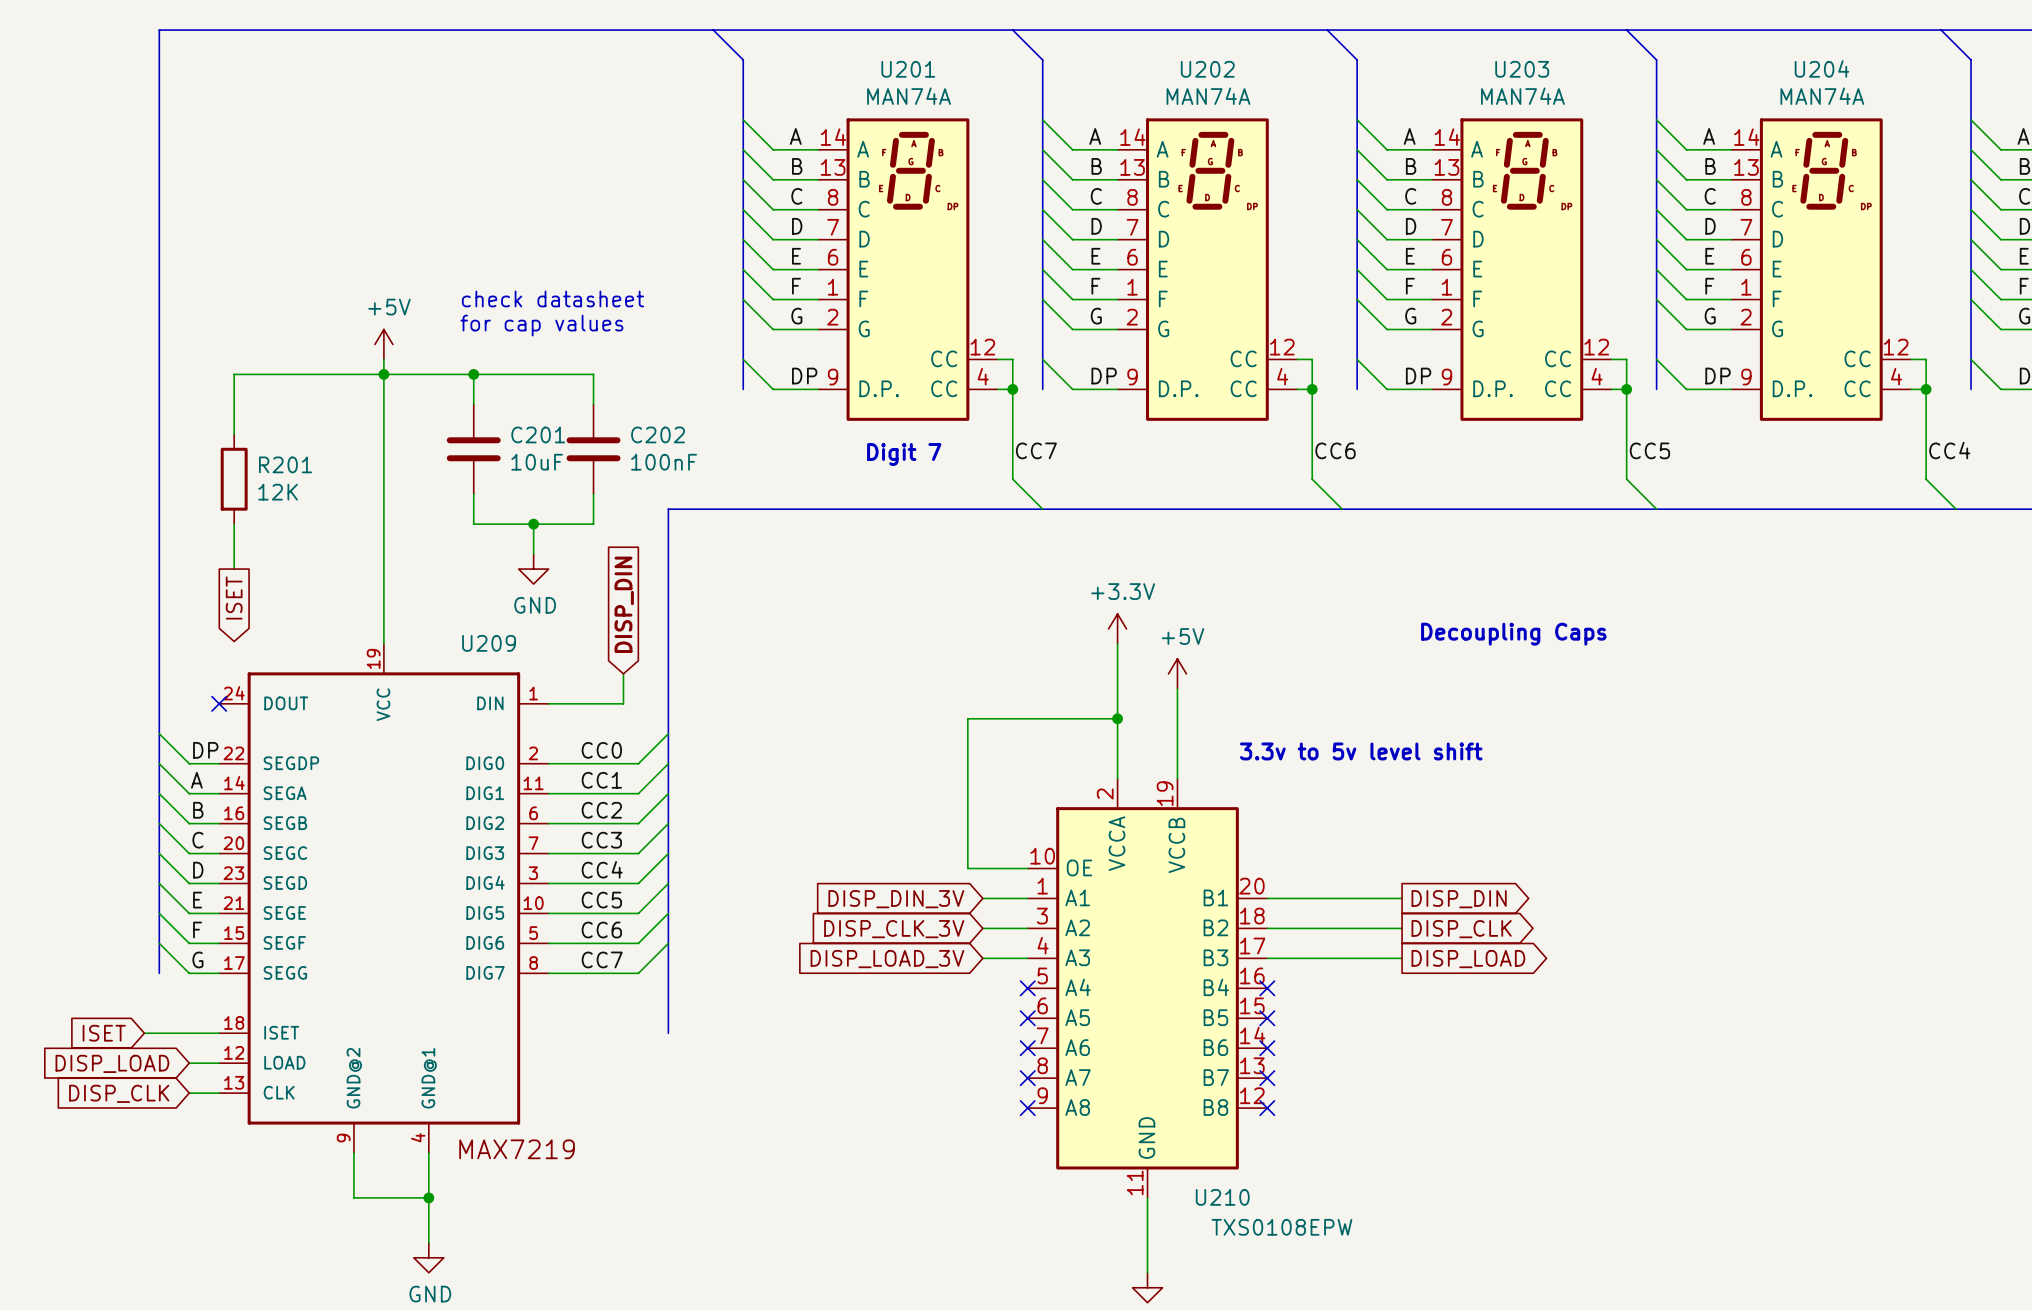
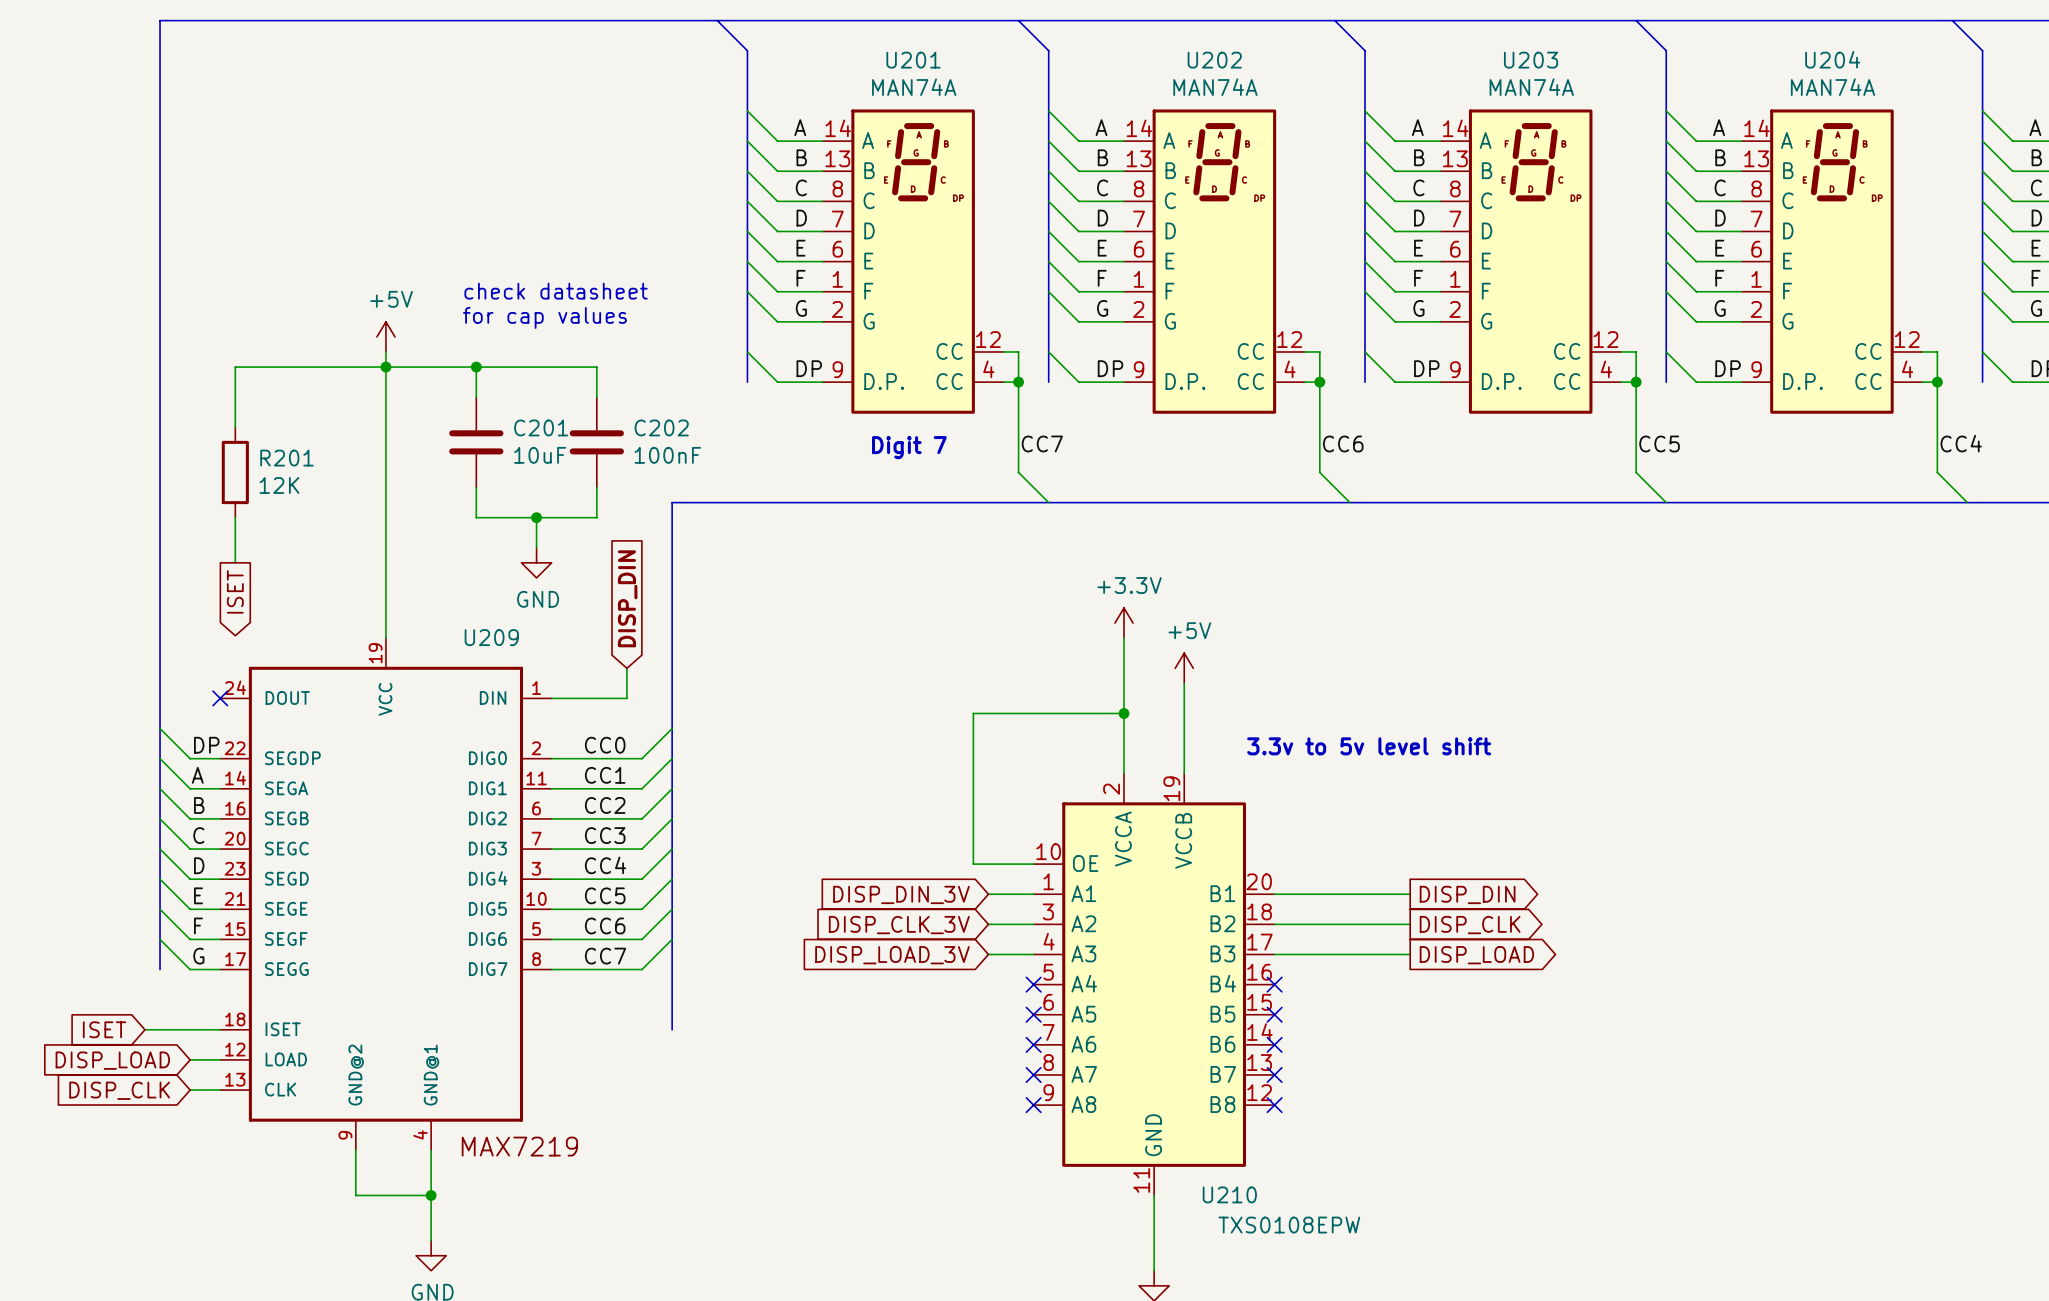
text: Decoupling Caps (1513, 634) -> none

